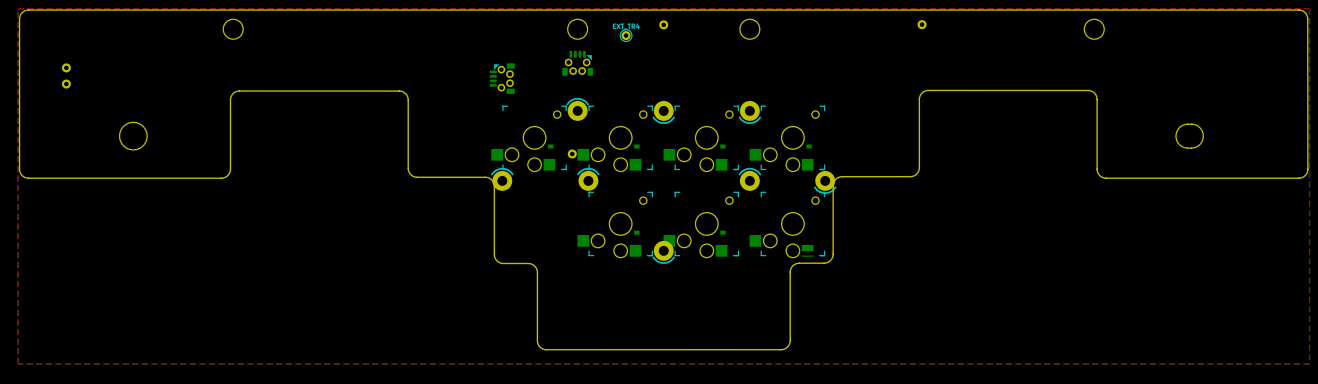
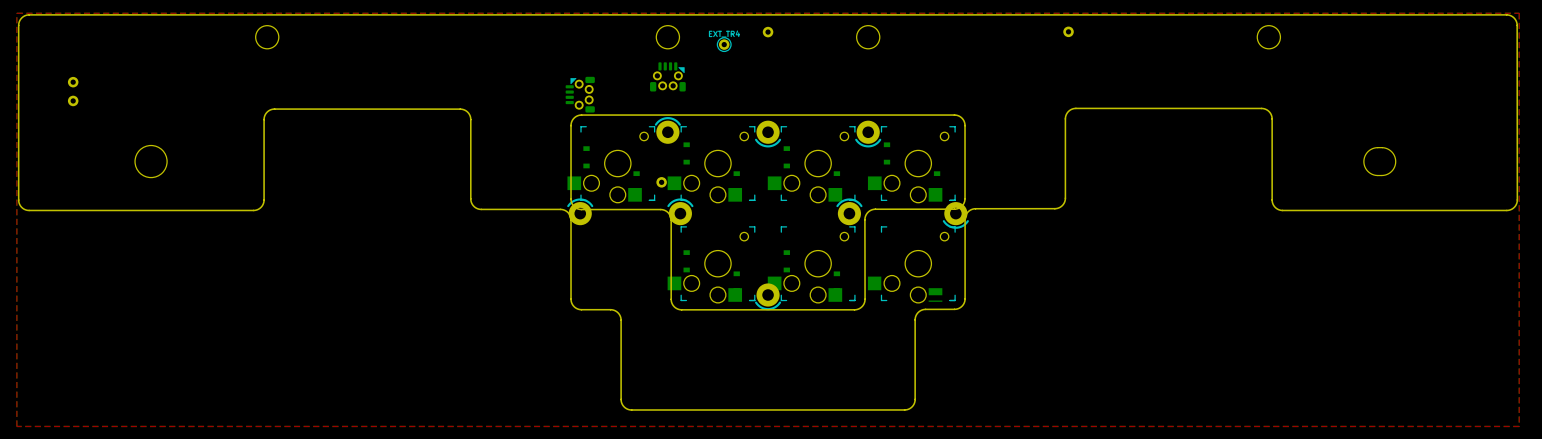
drawing: none -> [570, 114, 966, 311]
part: none -> (686, 153)
part: none -> (886, 153)
part: none -> (586, 157)
part: none -> (786, 157)
part position: (749, 179) -> (849, 211)
part: none -> (686, 261)
part: none -> (786, 261)

